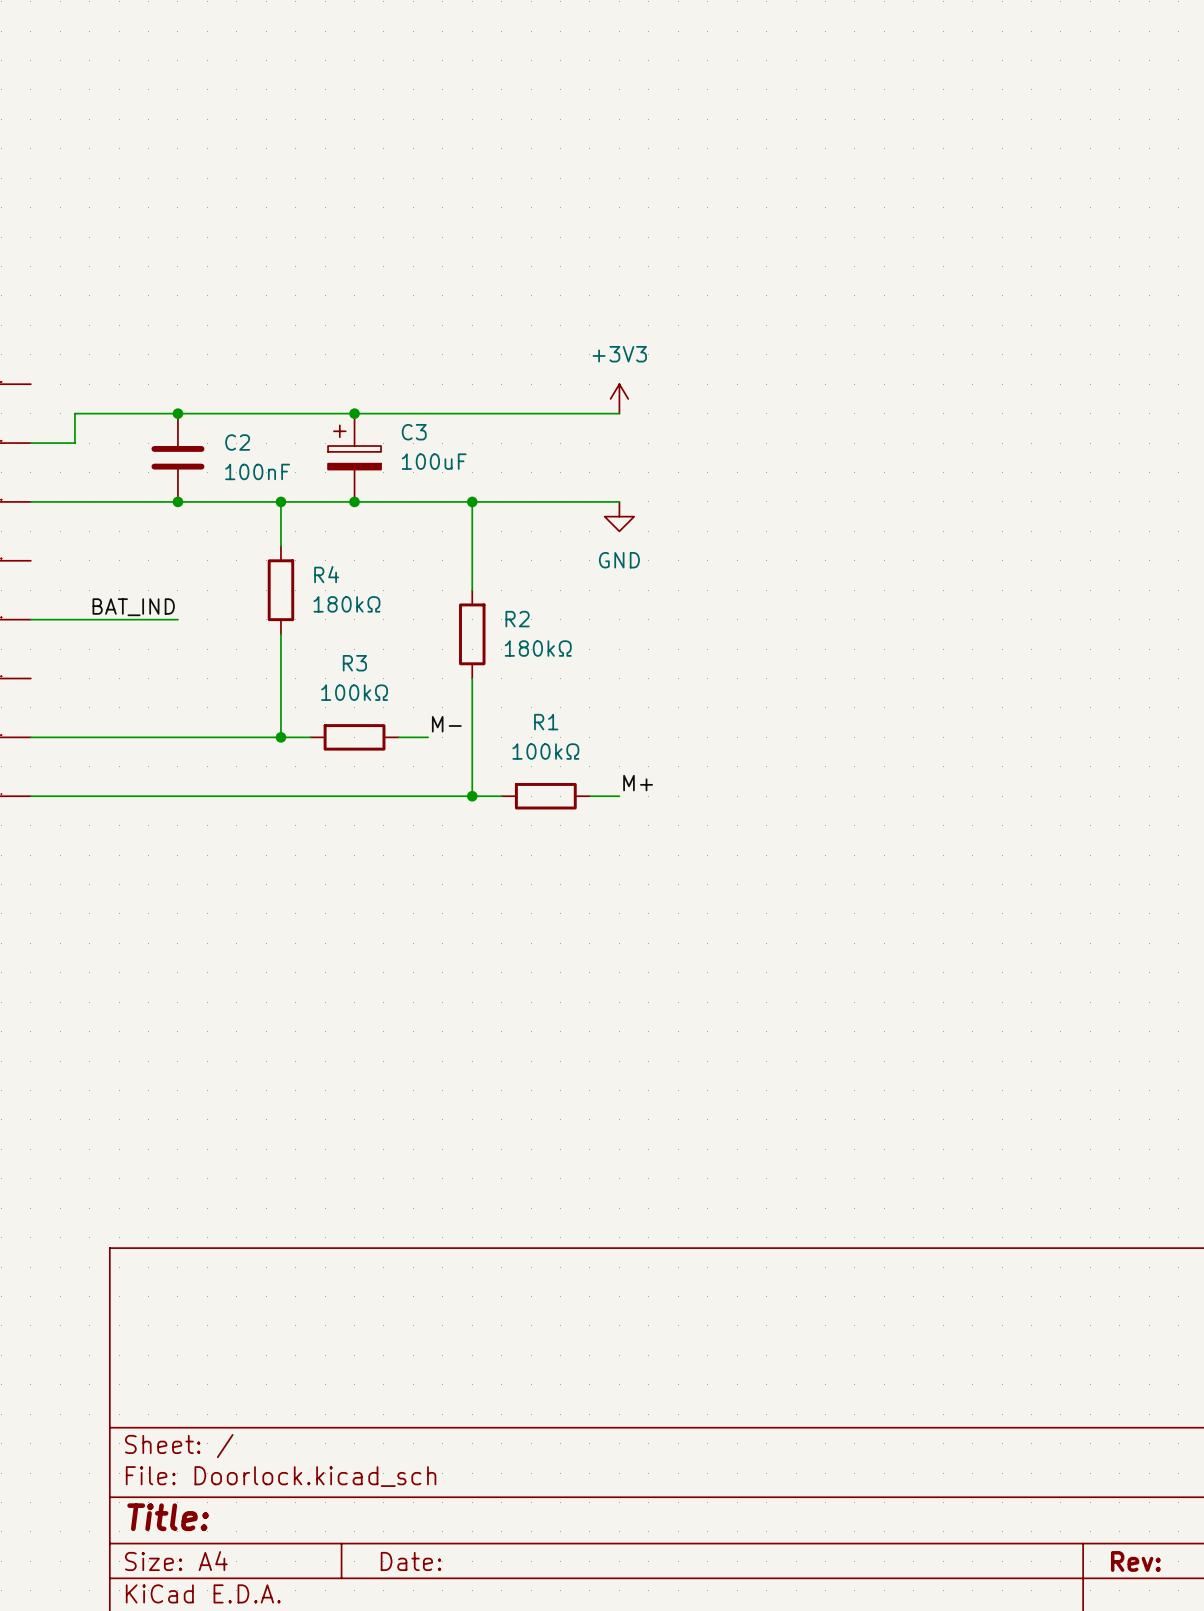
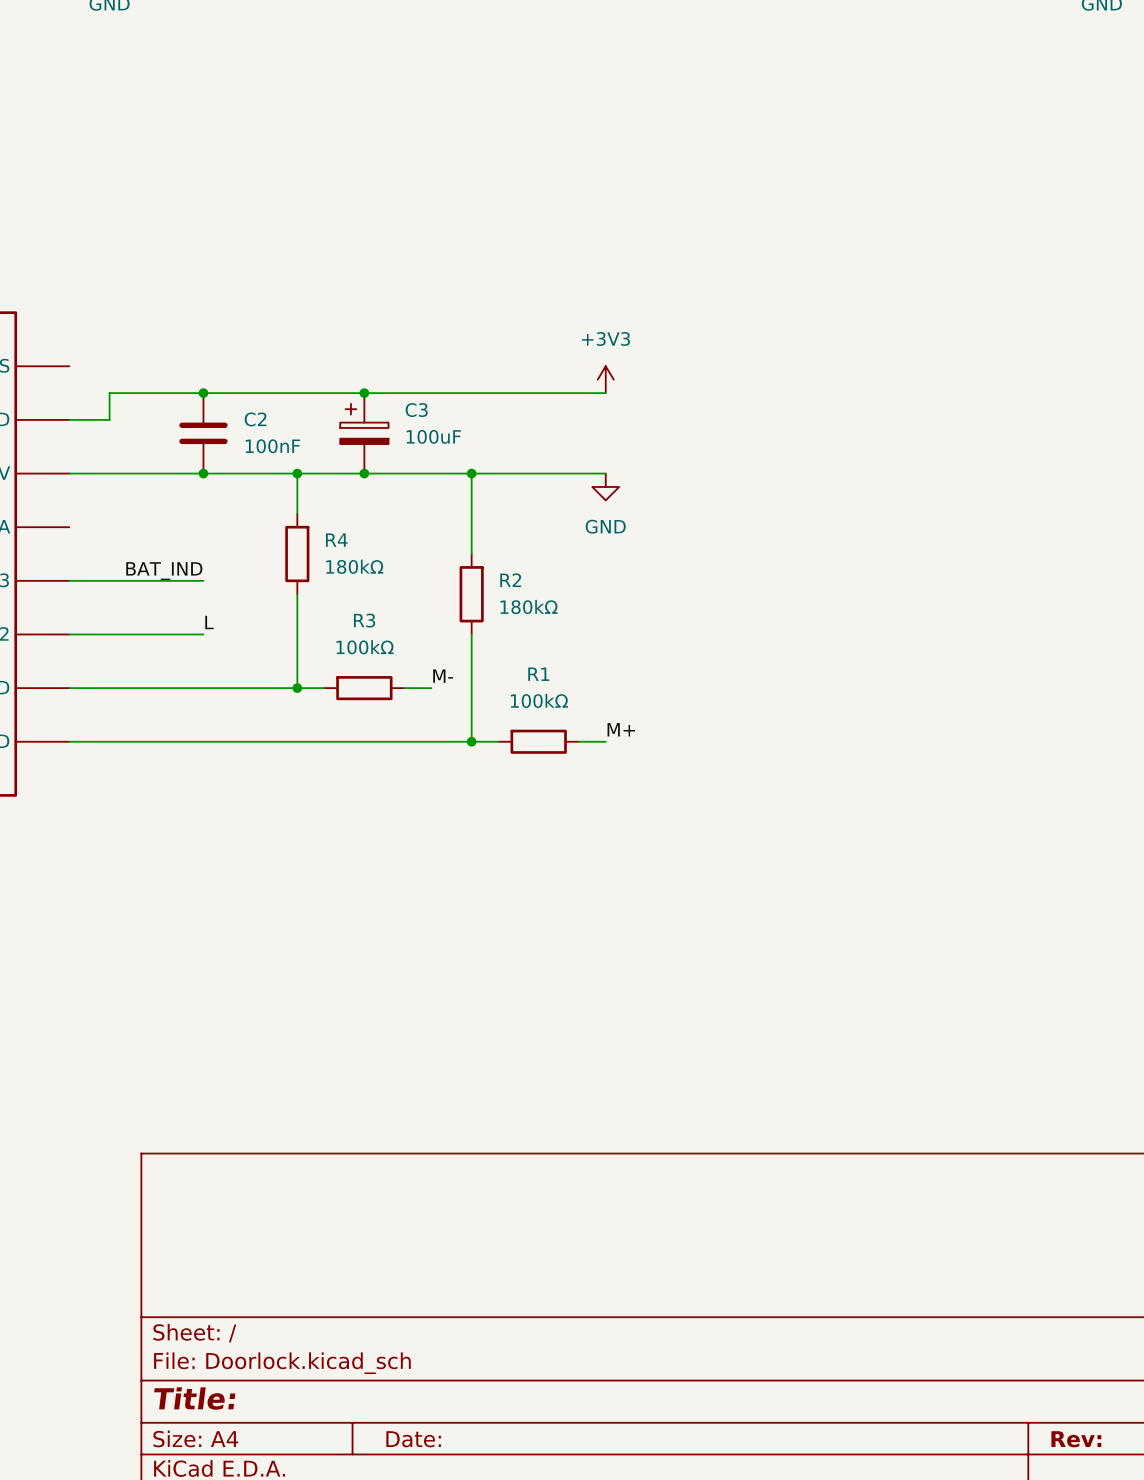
label: none -> L (209, 622)
wire: none -> (69, 634) (203, 634)

